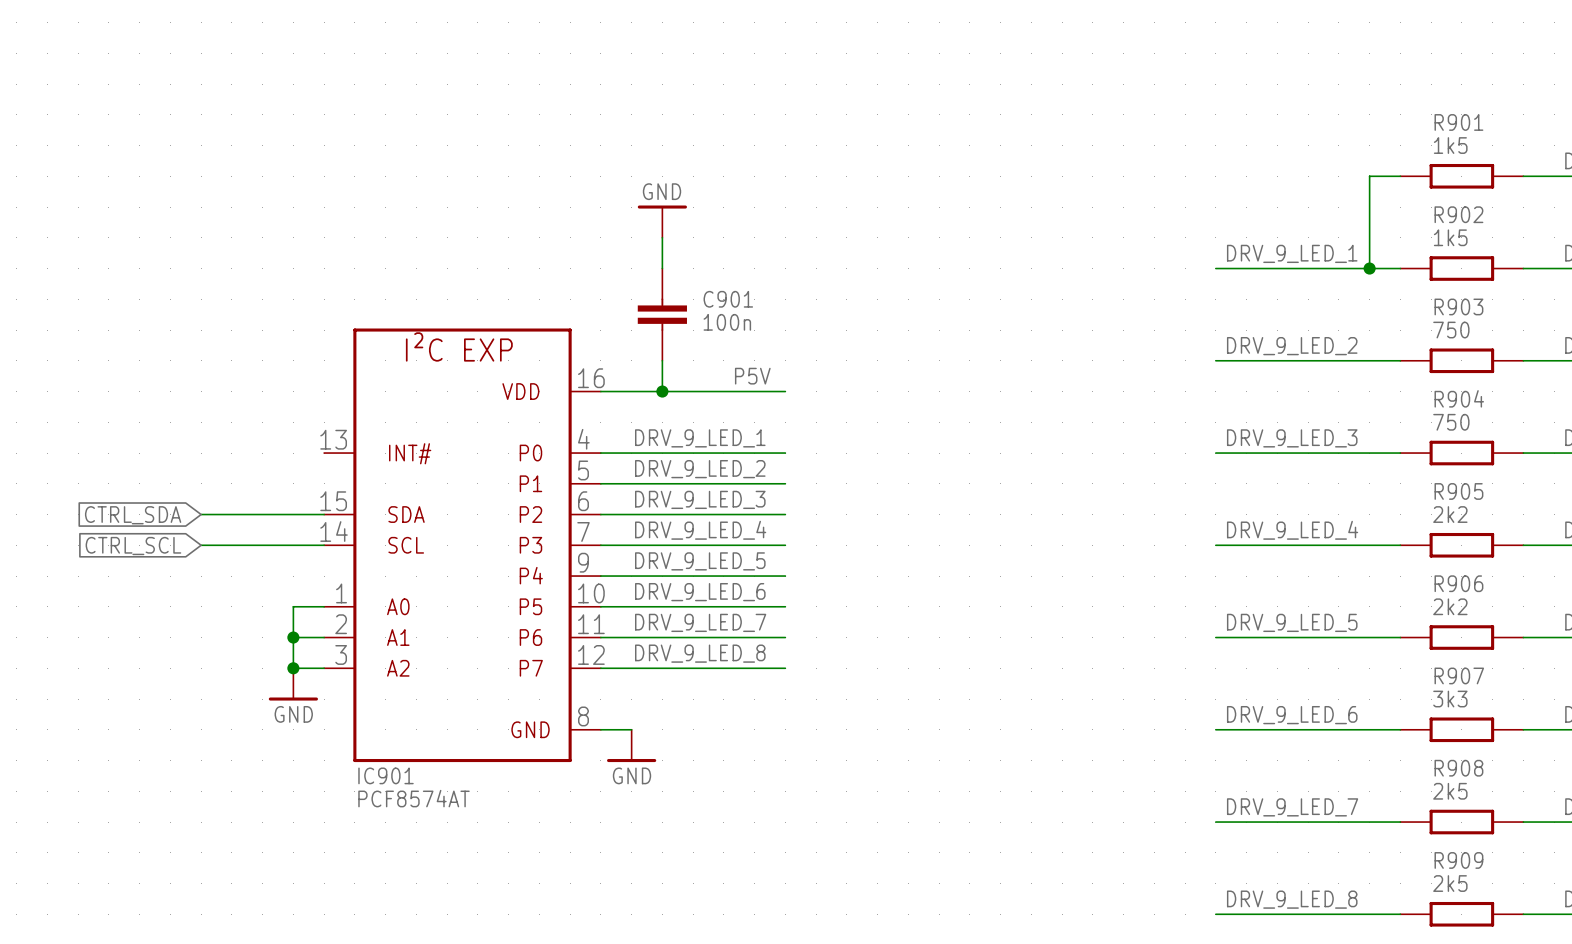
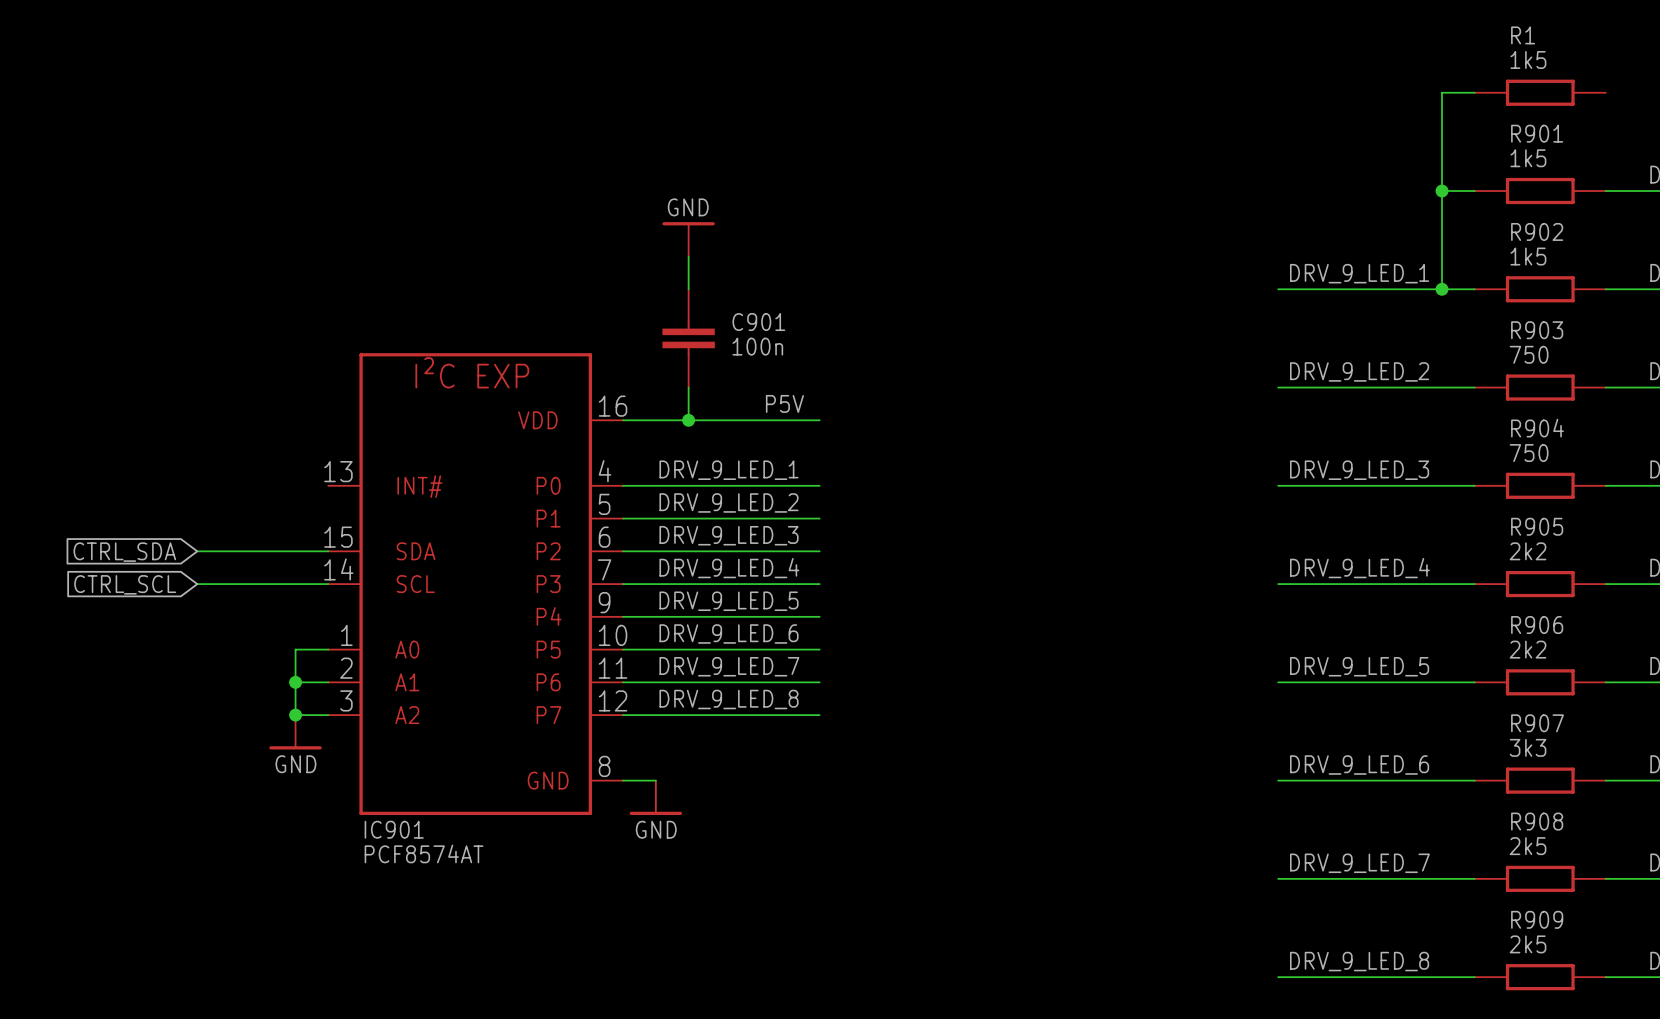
wire: none -> (1474, 92) (1442, 92) (1442, 191)
R1: none -> 1k5 (1540, 92)
junction: none -> (1442, 191)

